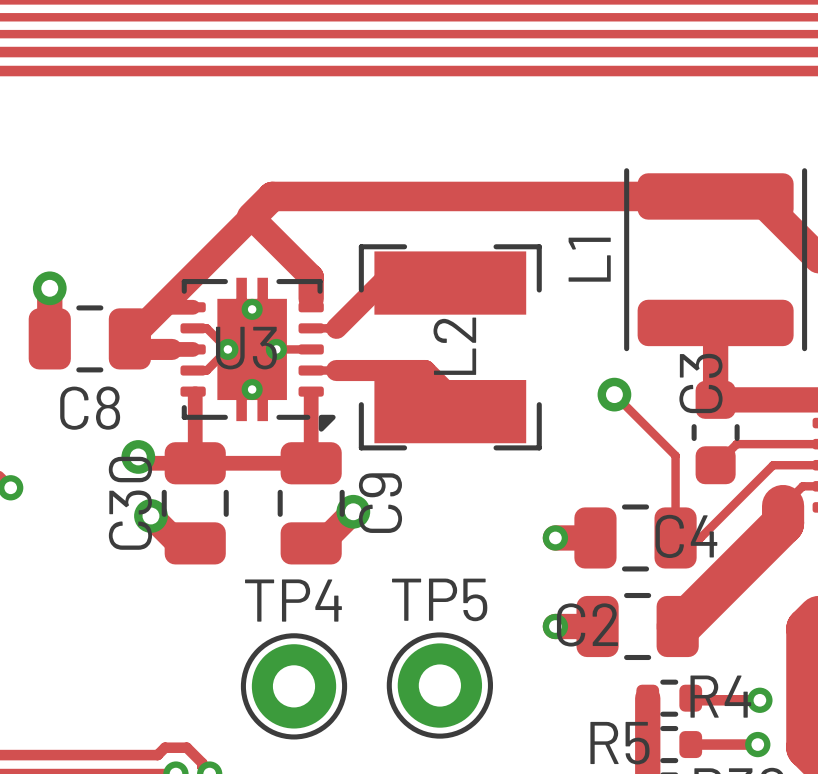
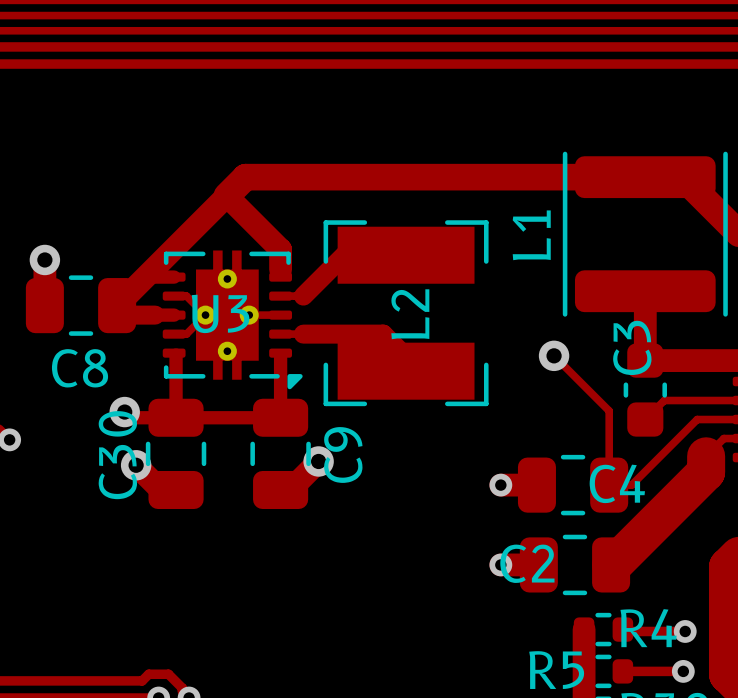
TP5: (439, 685) -> none
TP4: (294, 686) -> none

